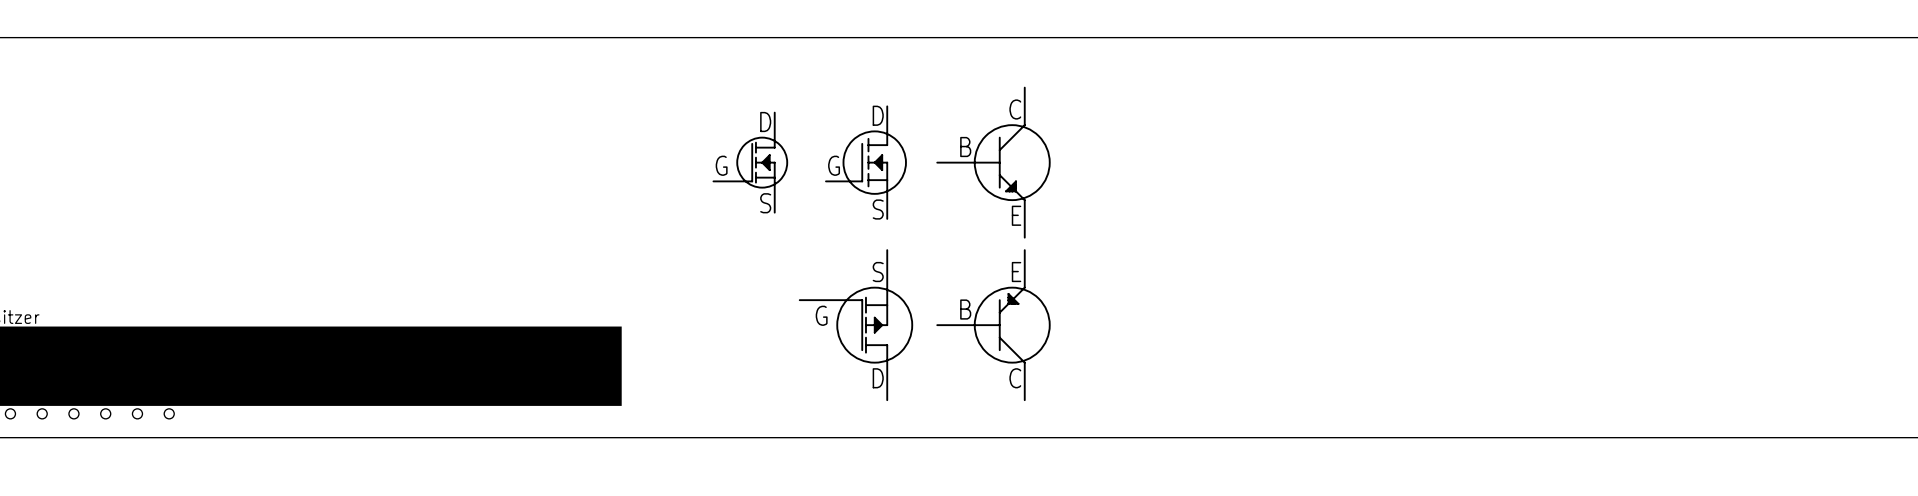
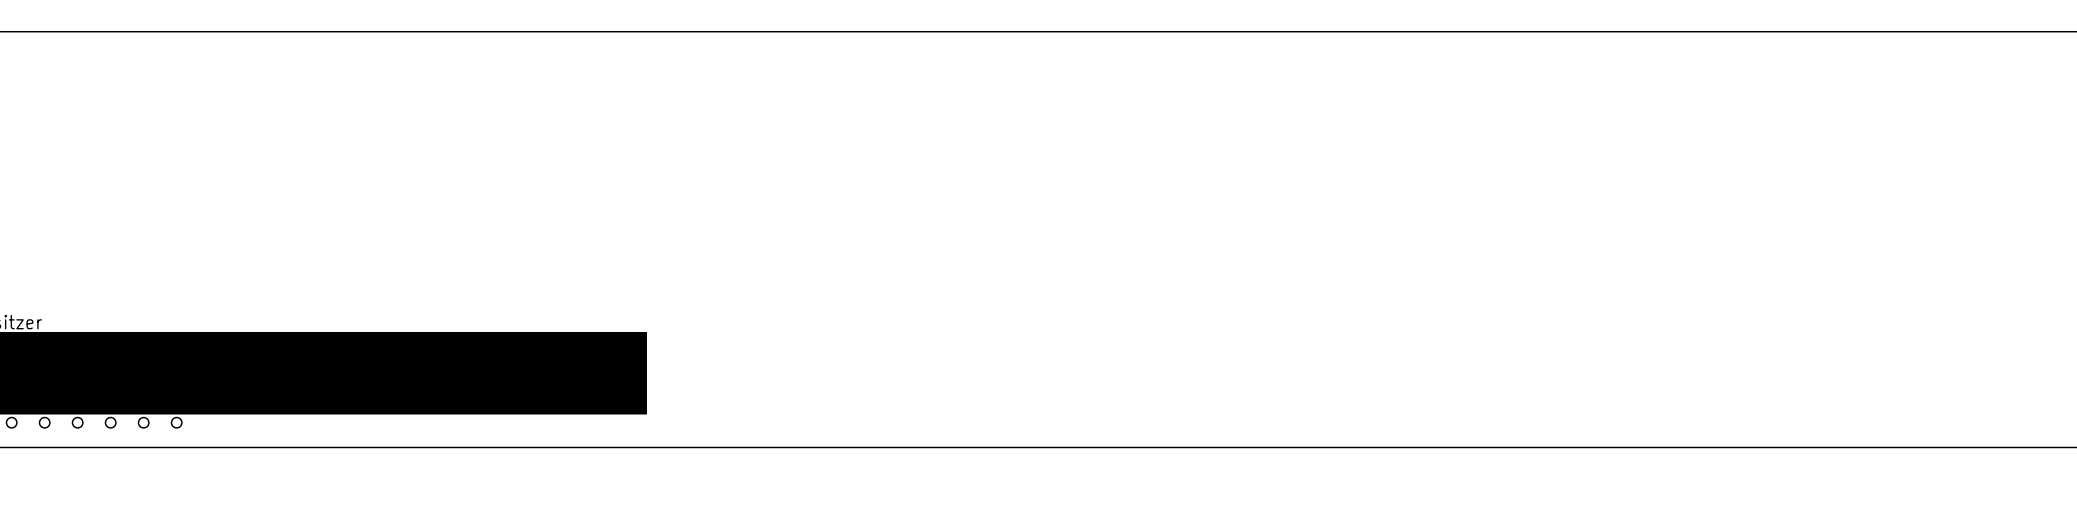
drawing: [936, 86, 1051, 402] -> none
drawing: [825, 105, 907, 220] -> none
drawing: [712, 111, 789, 214] -> none
drawing: [798, 249, 914, 402] -> none

